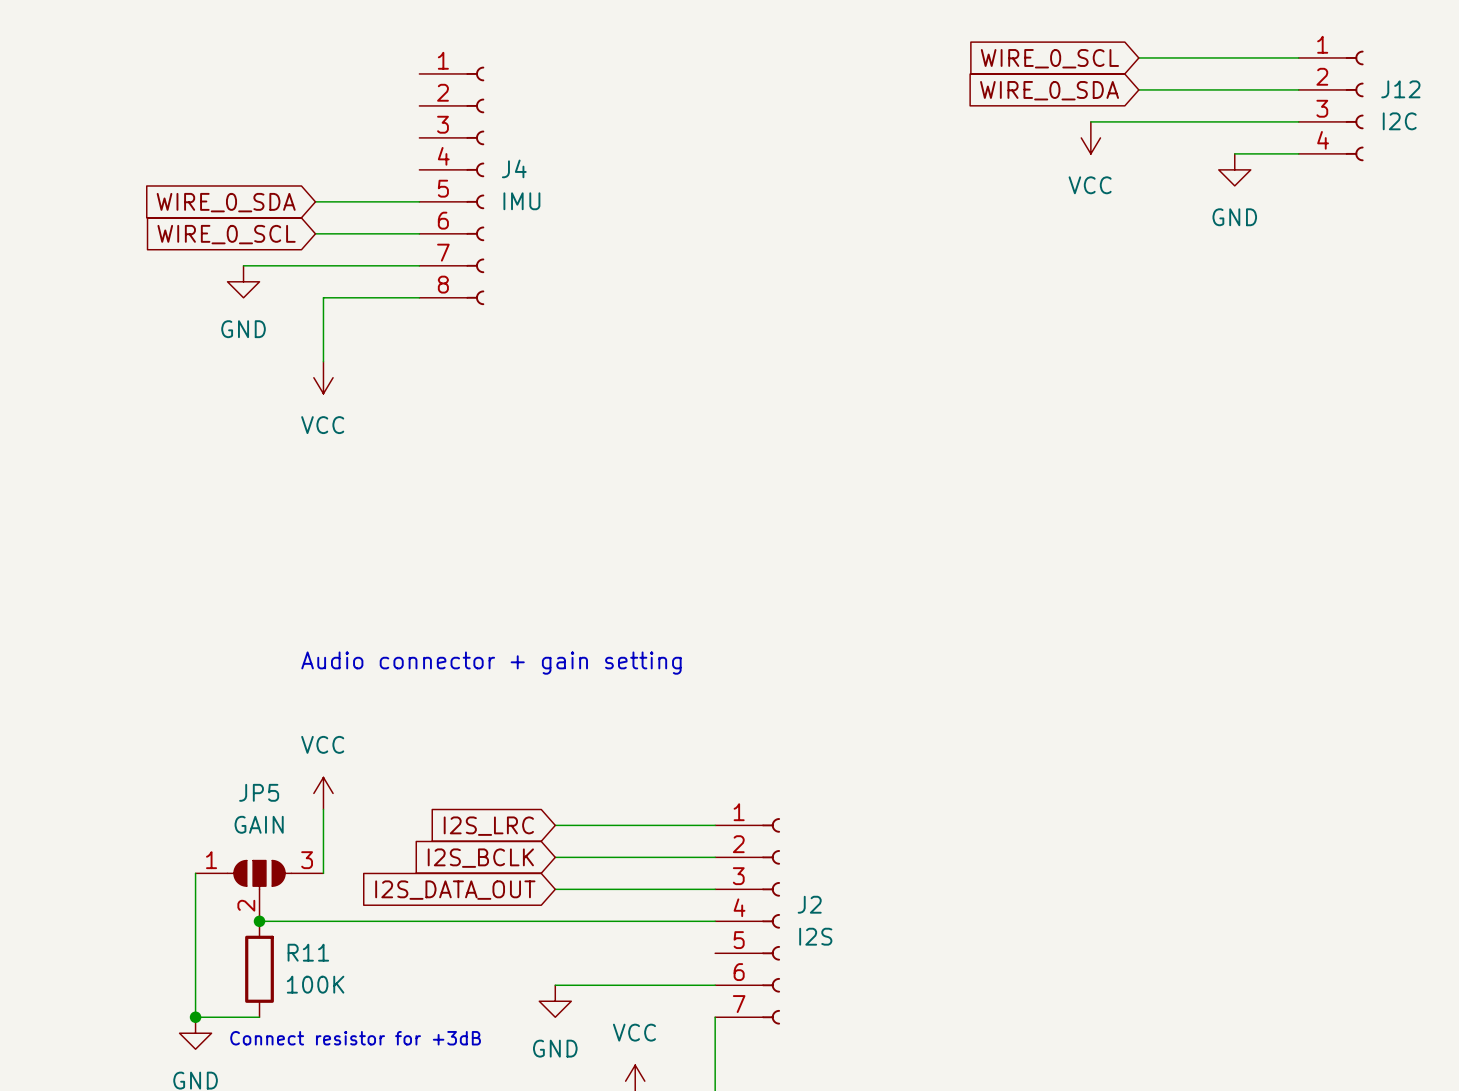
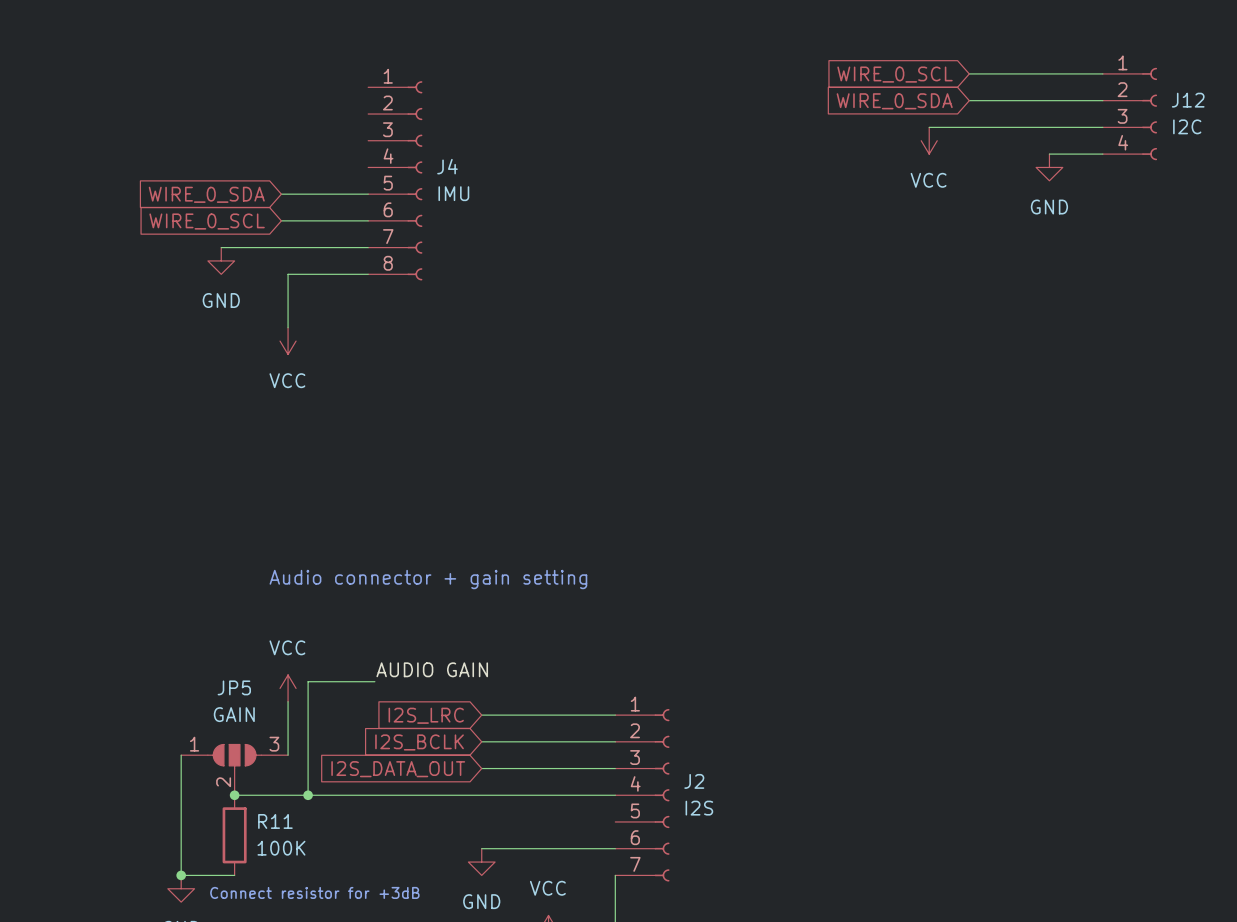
label: none -> AUDIO GAIN (432, 669)
wire: none -> (374, 681) (308, 681) (308, 795)
junction: none -> (308, 795)

